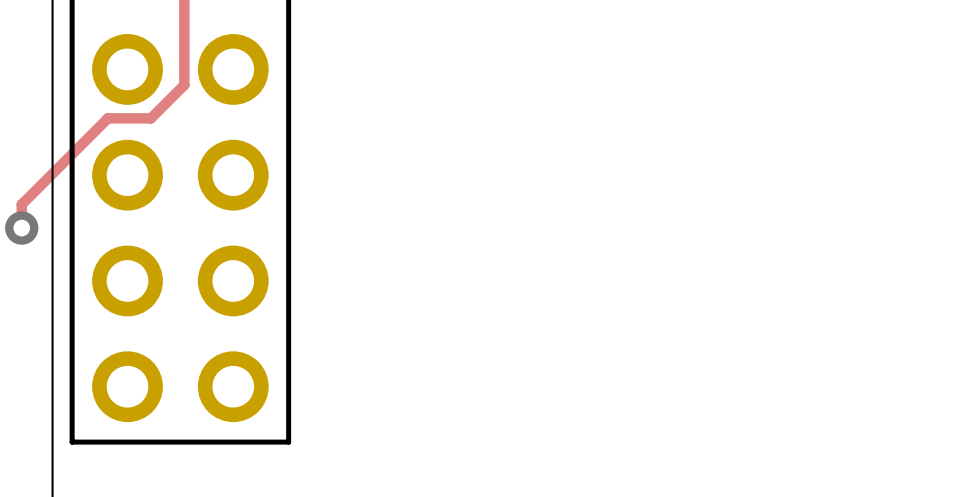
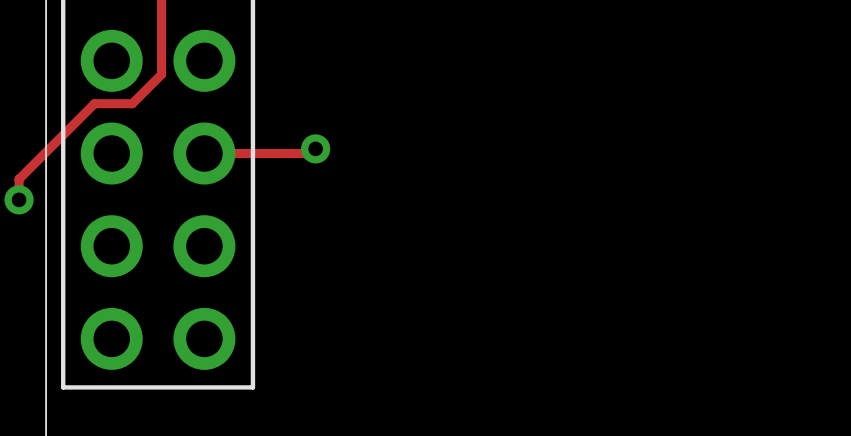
track: none -> (315, 148) (311, 153) (204, 153)
via: none -> (315, 148)

